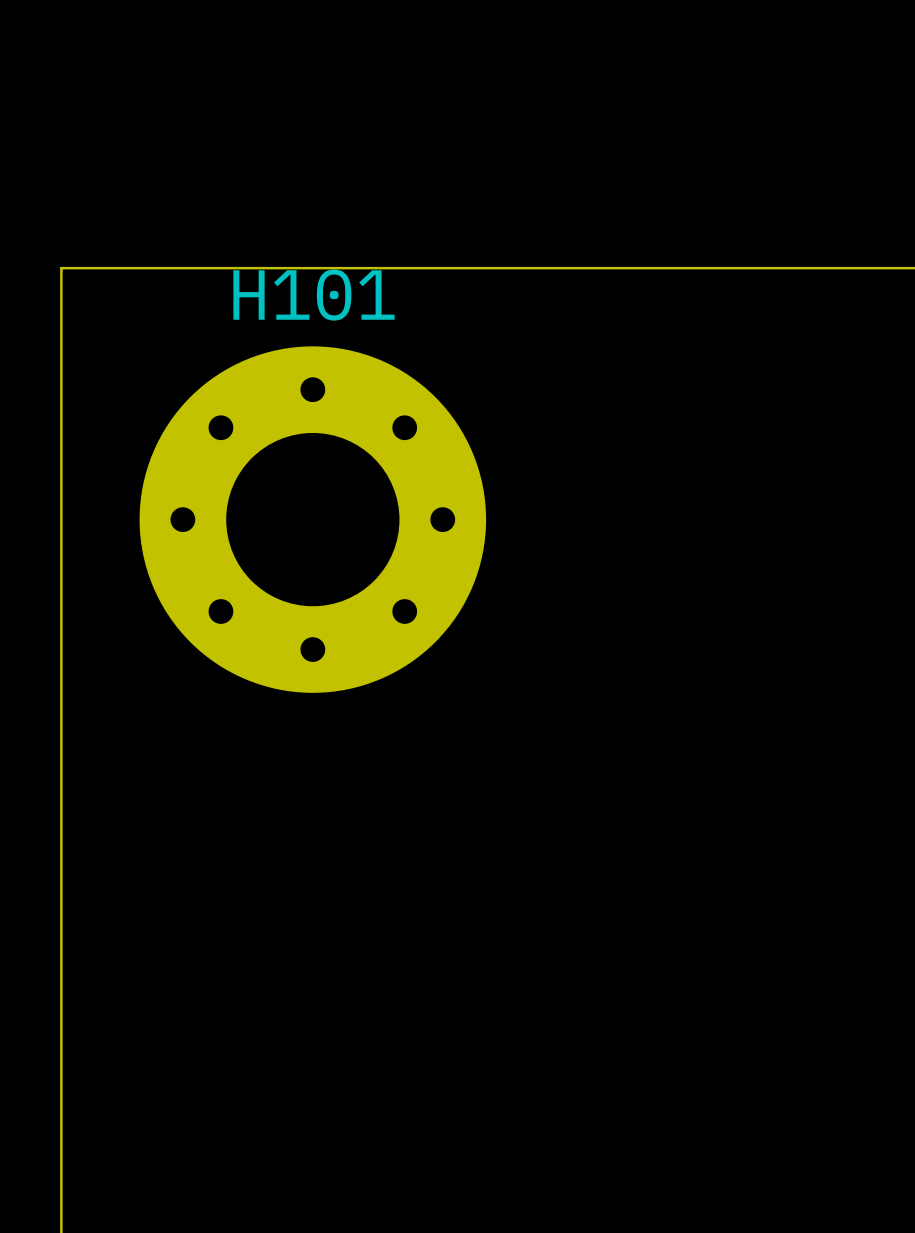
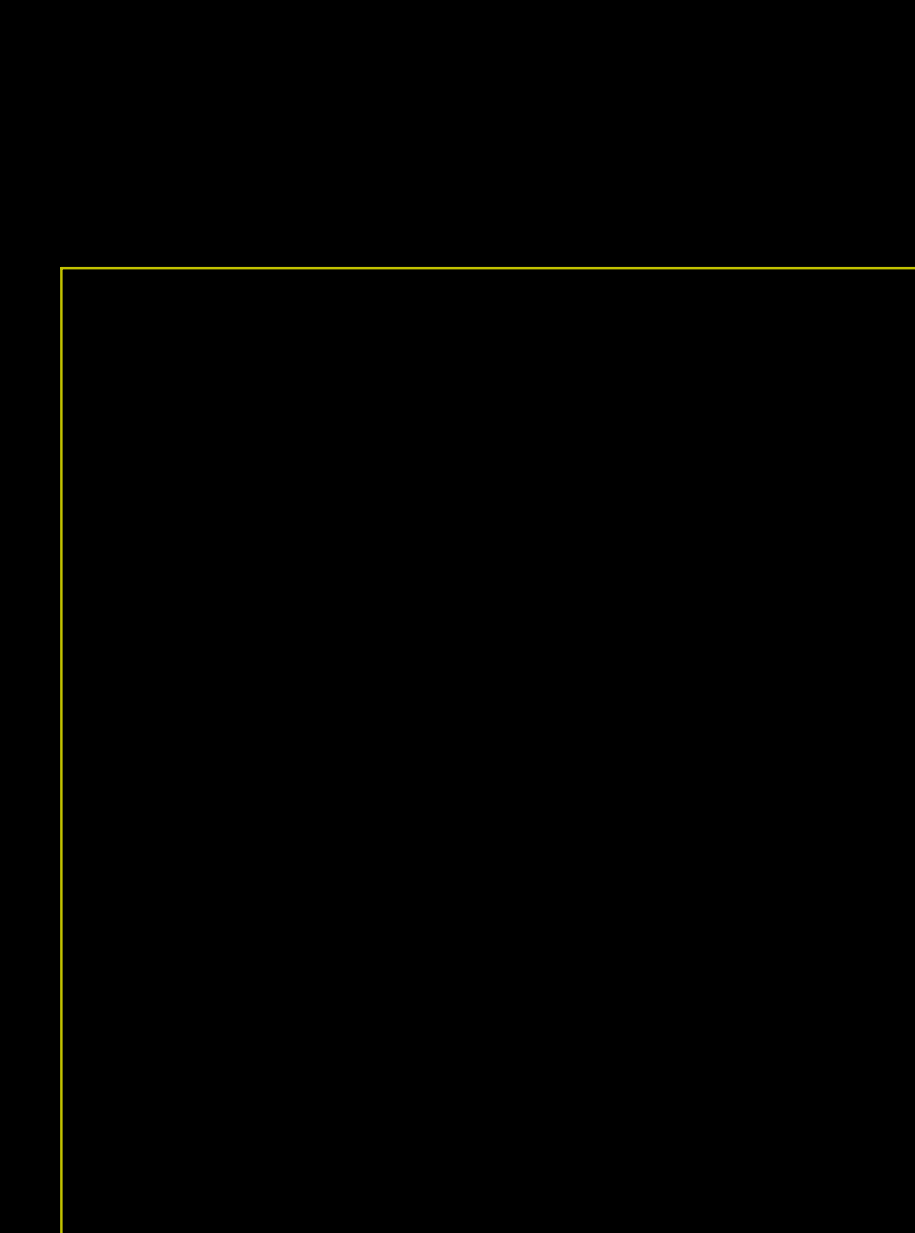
H101: (312, 519) -> none

